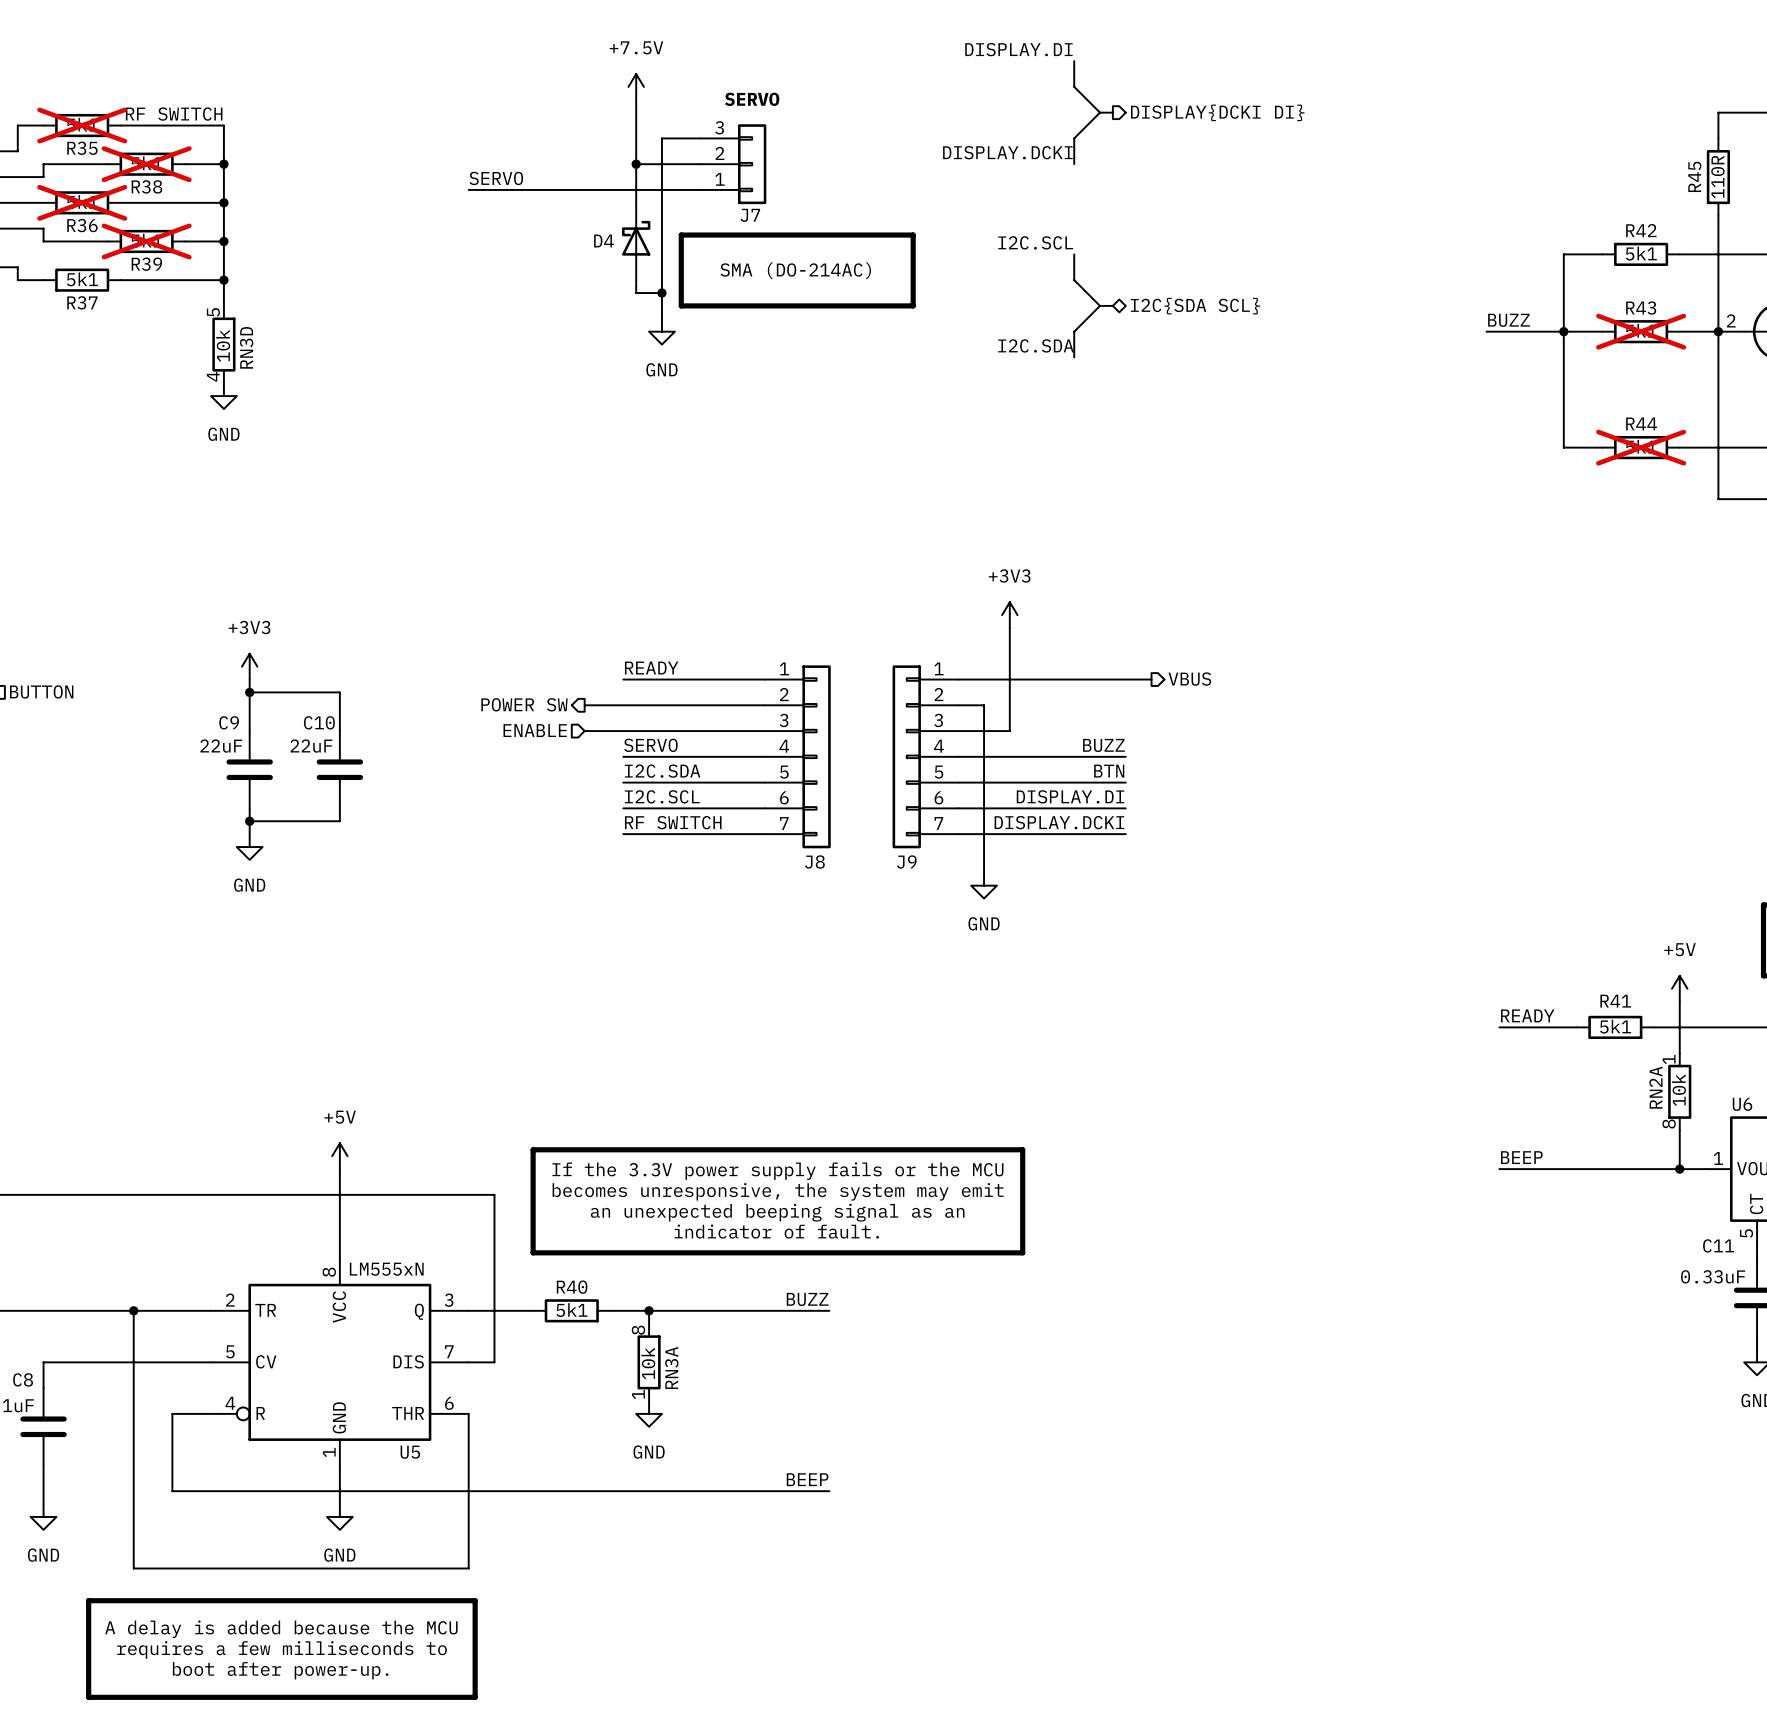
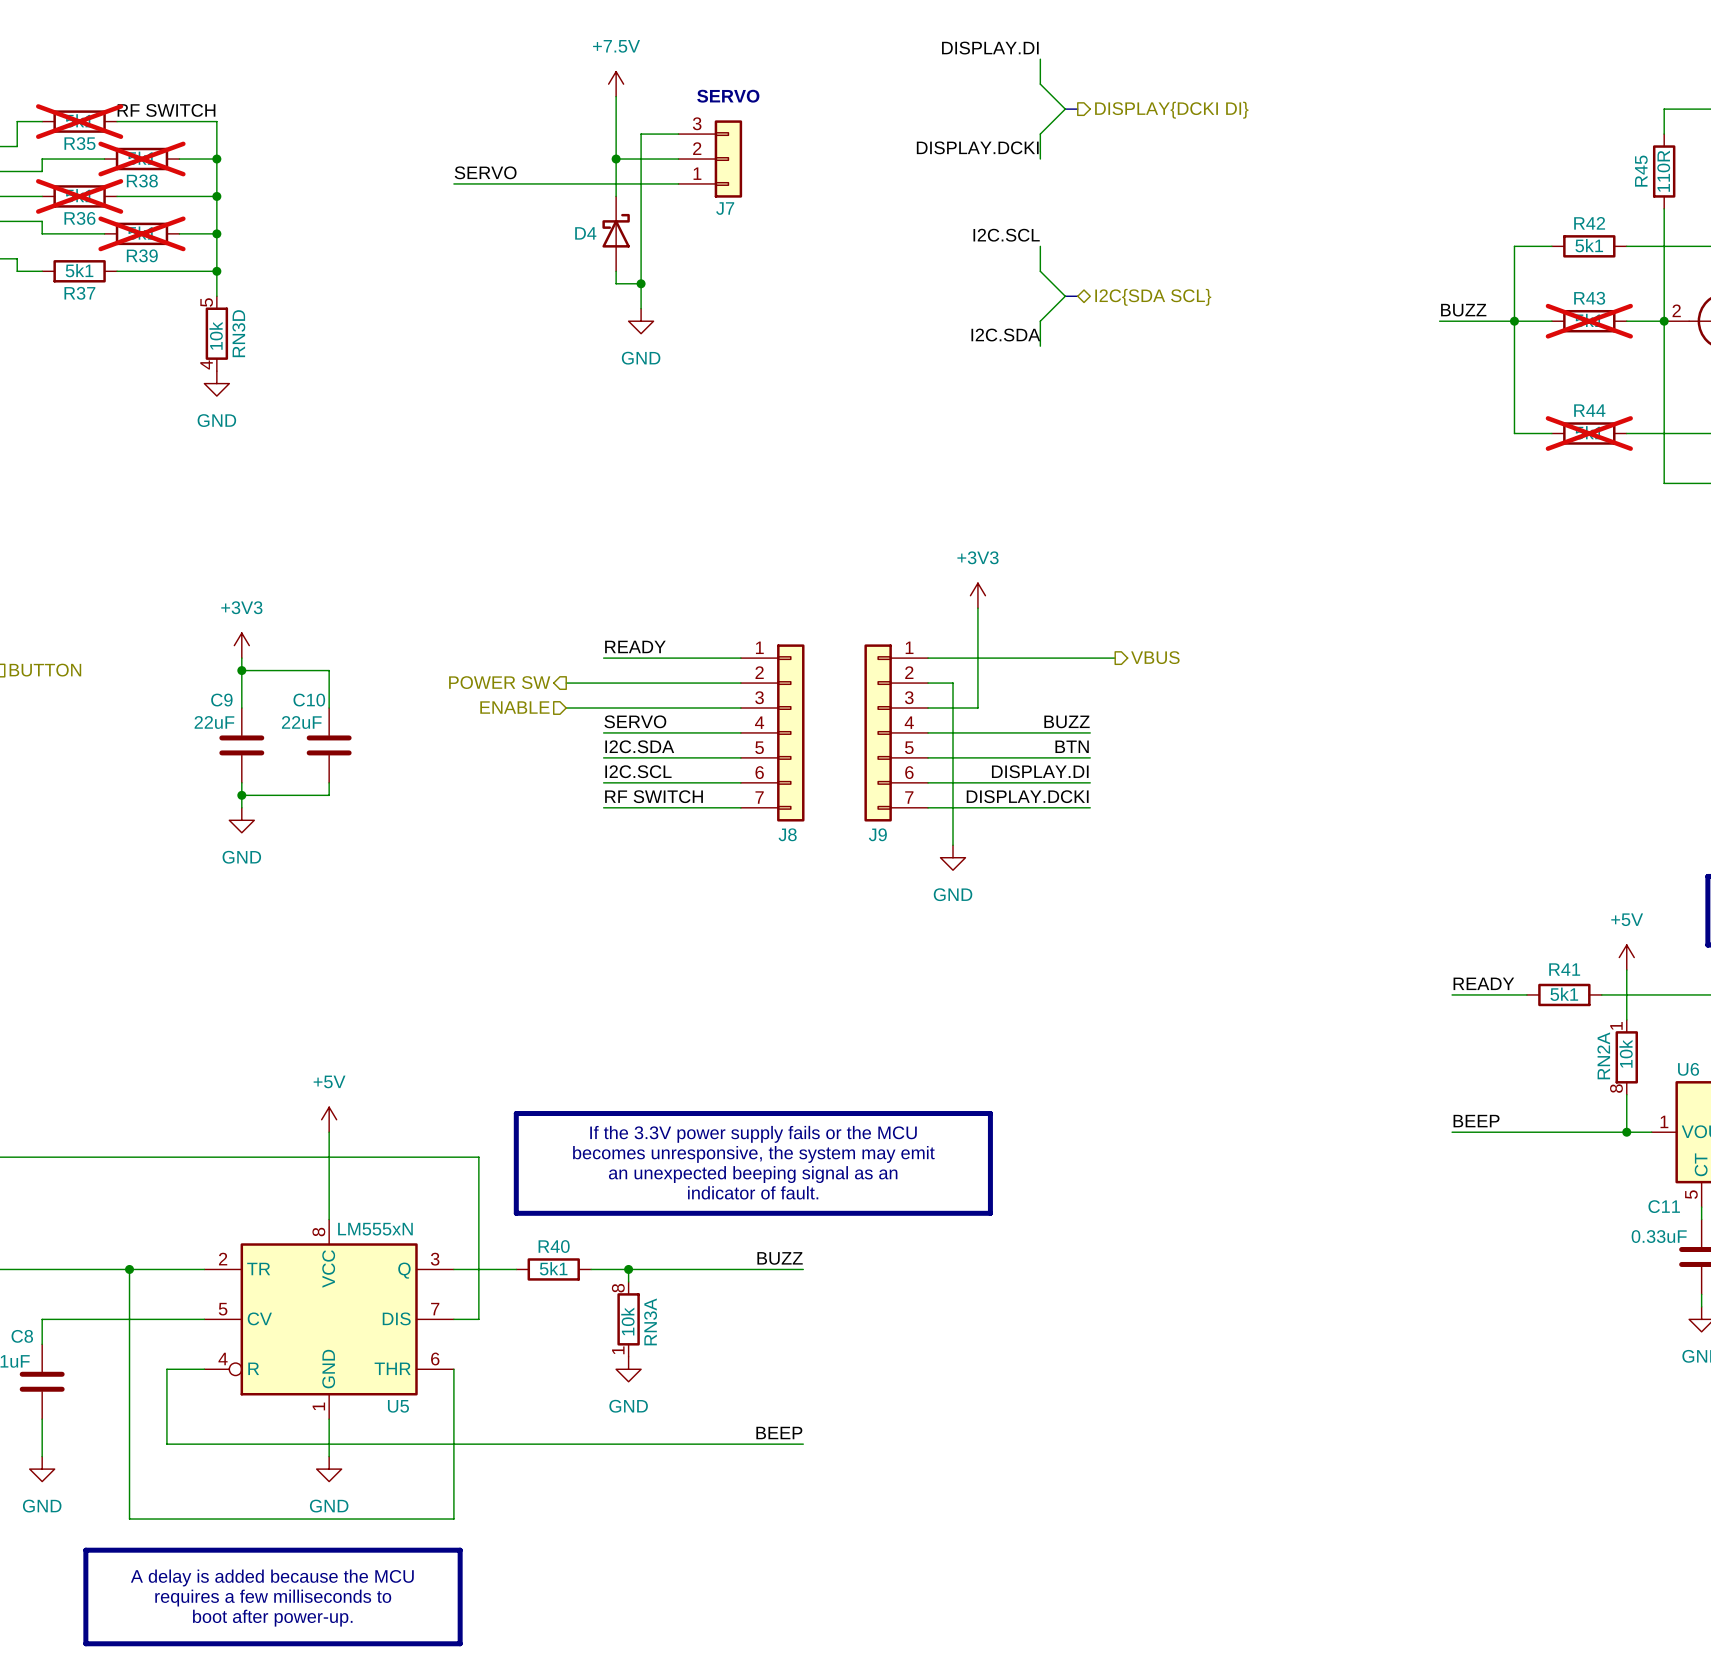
line: (681, 235) (913, 235) (913, 305) (681, 305) (681, 235) -> none
text: SMA (DO-214AC) (795, 270) -> none

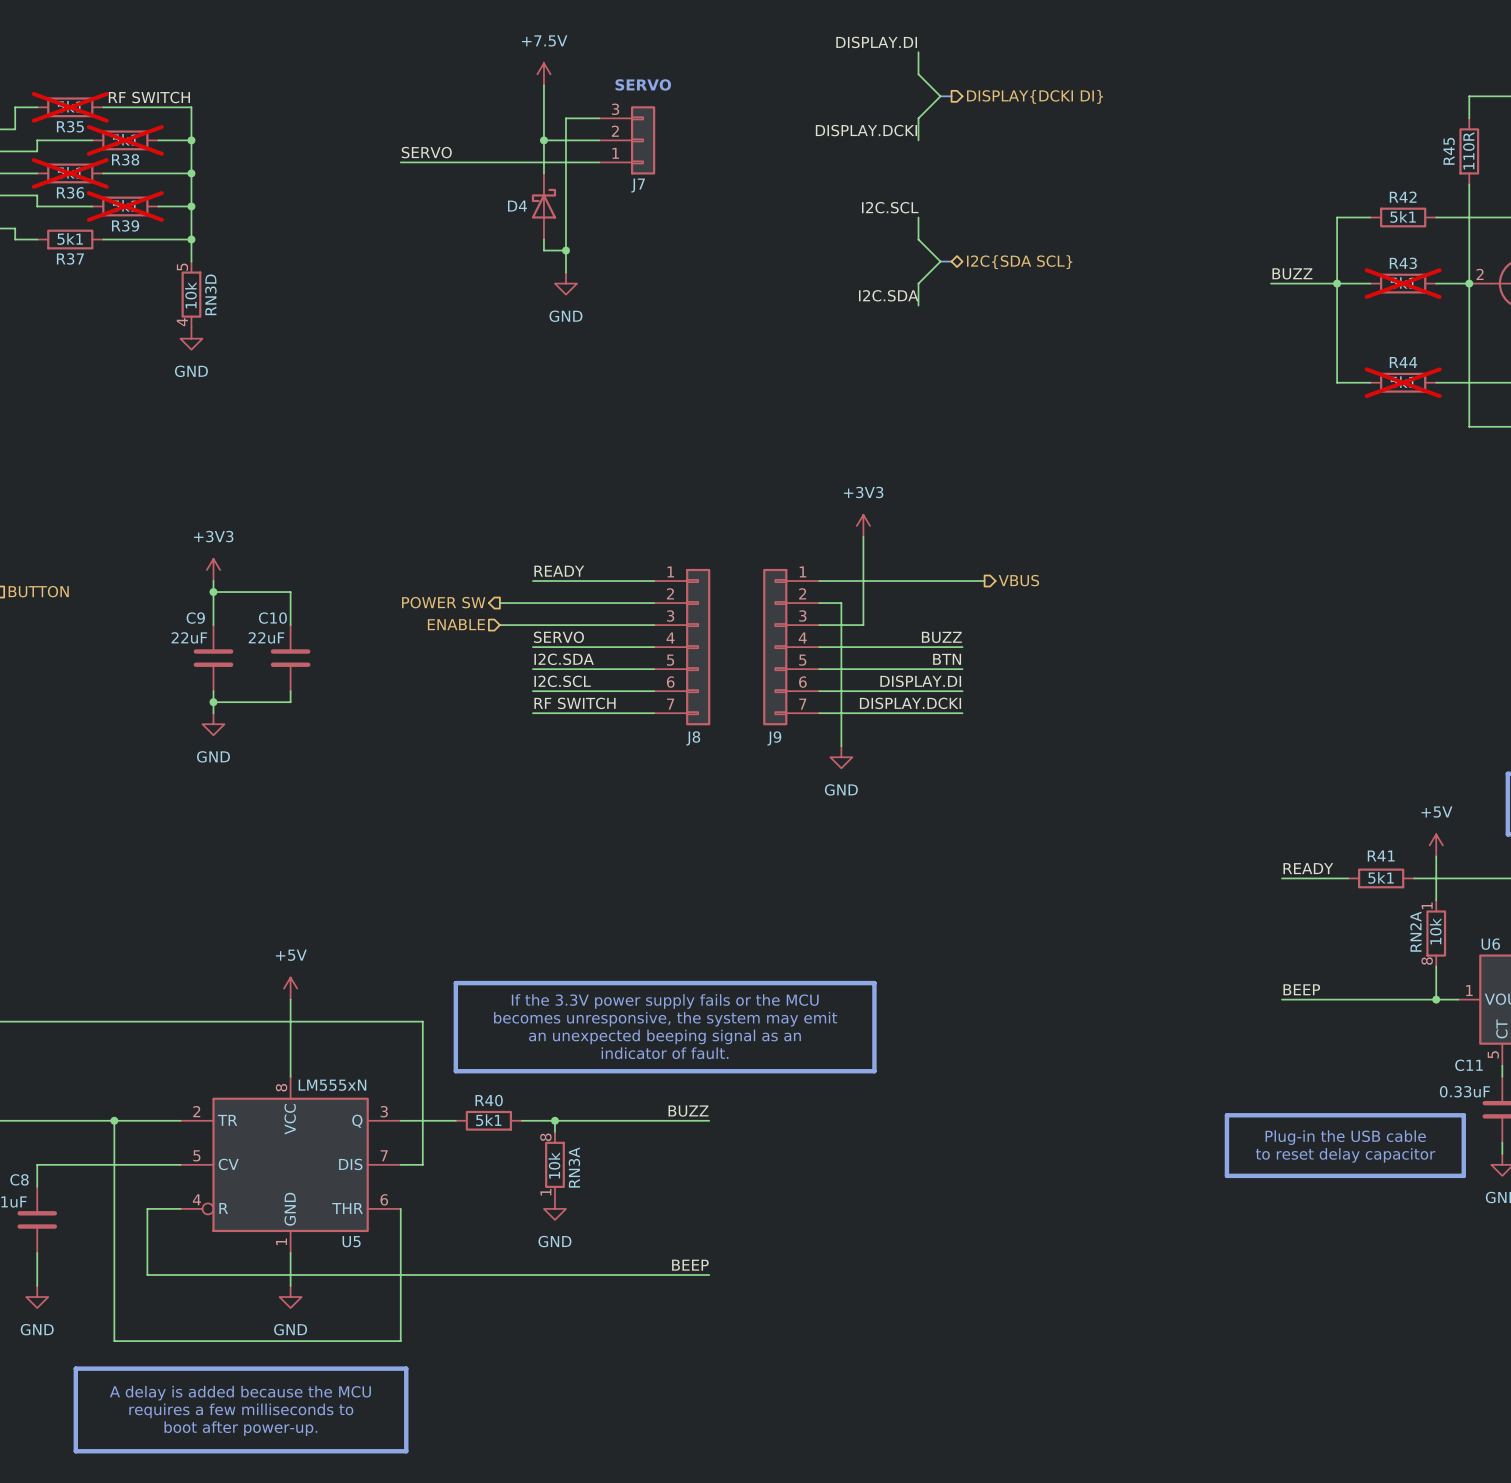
line: none -> (1226, 1115) (1463, 1115) (1463, 1175) (1226, 1175) (1226, 1115)
text: none -> Plug-in the USB cable (1345, 1137)
text: none -> to reset delay capacitor (1345, 1155)

